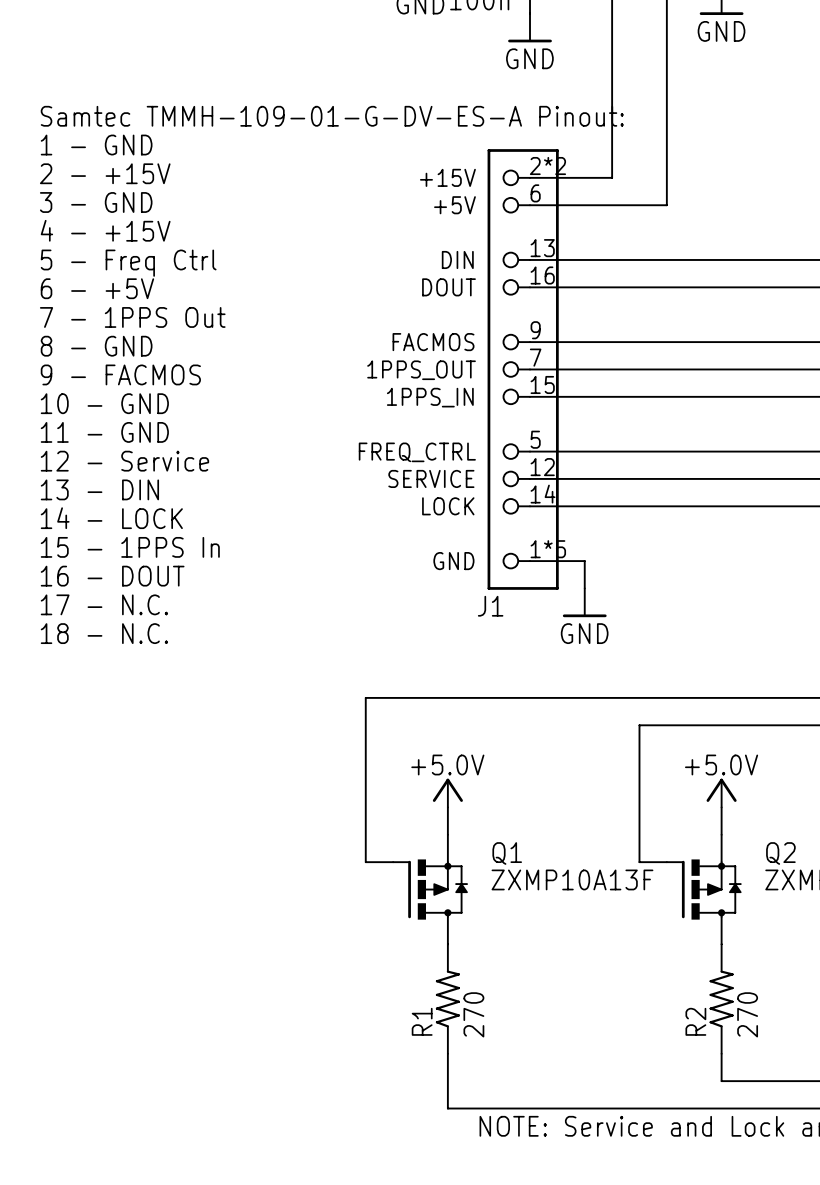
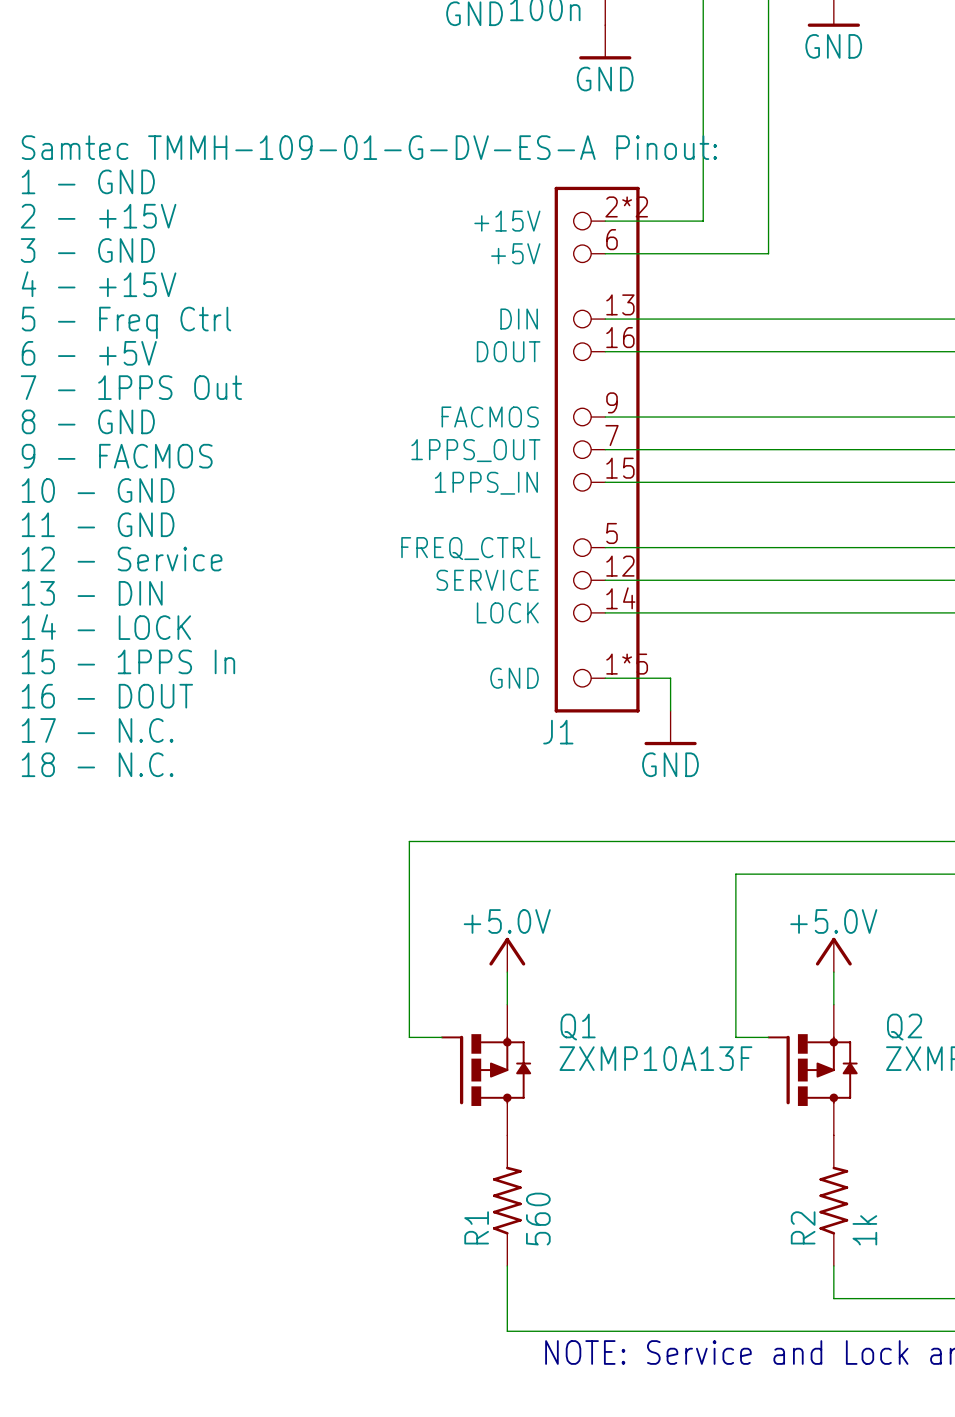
R1 value: 270 (473, 1014) -> 560 (538, 1219)
R2 value: 270 (747, 1014) -> 1k (864, 1230)

